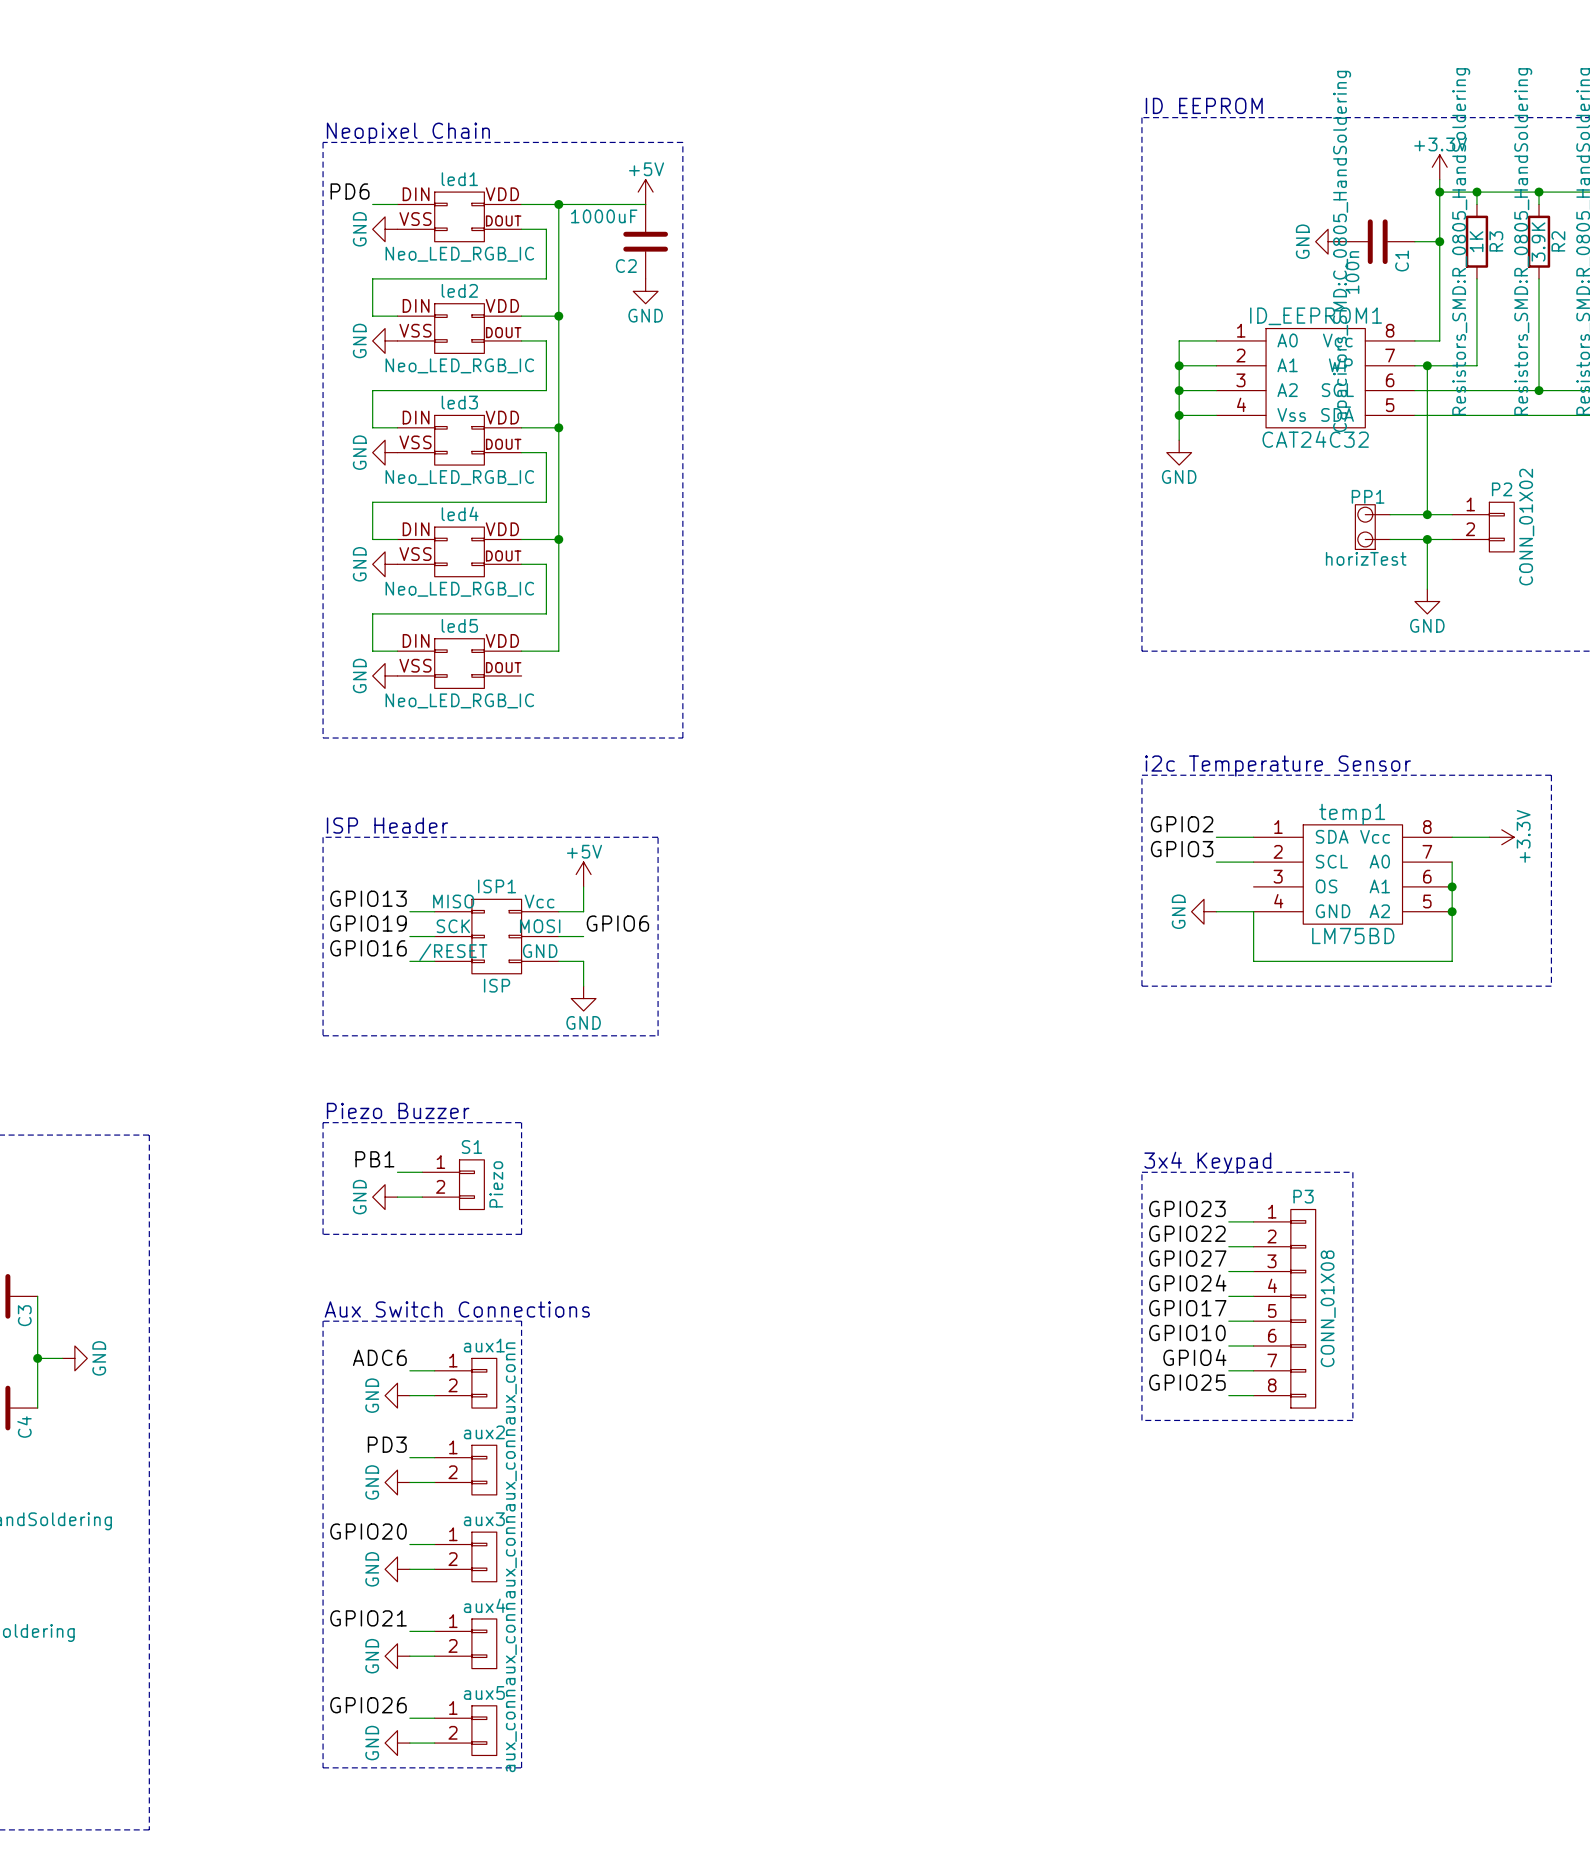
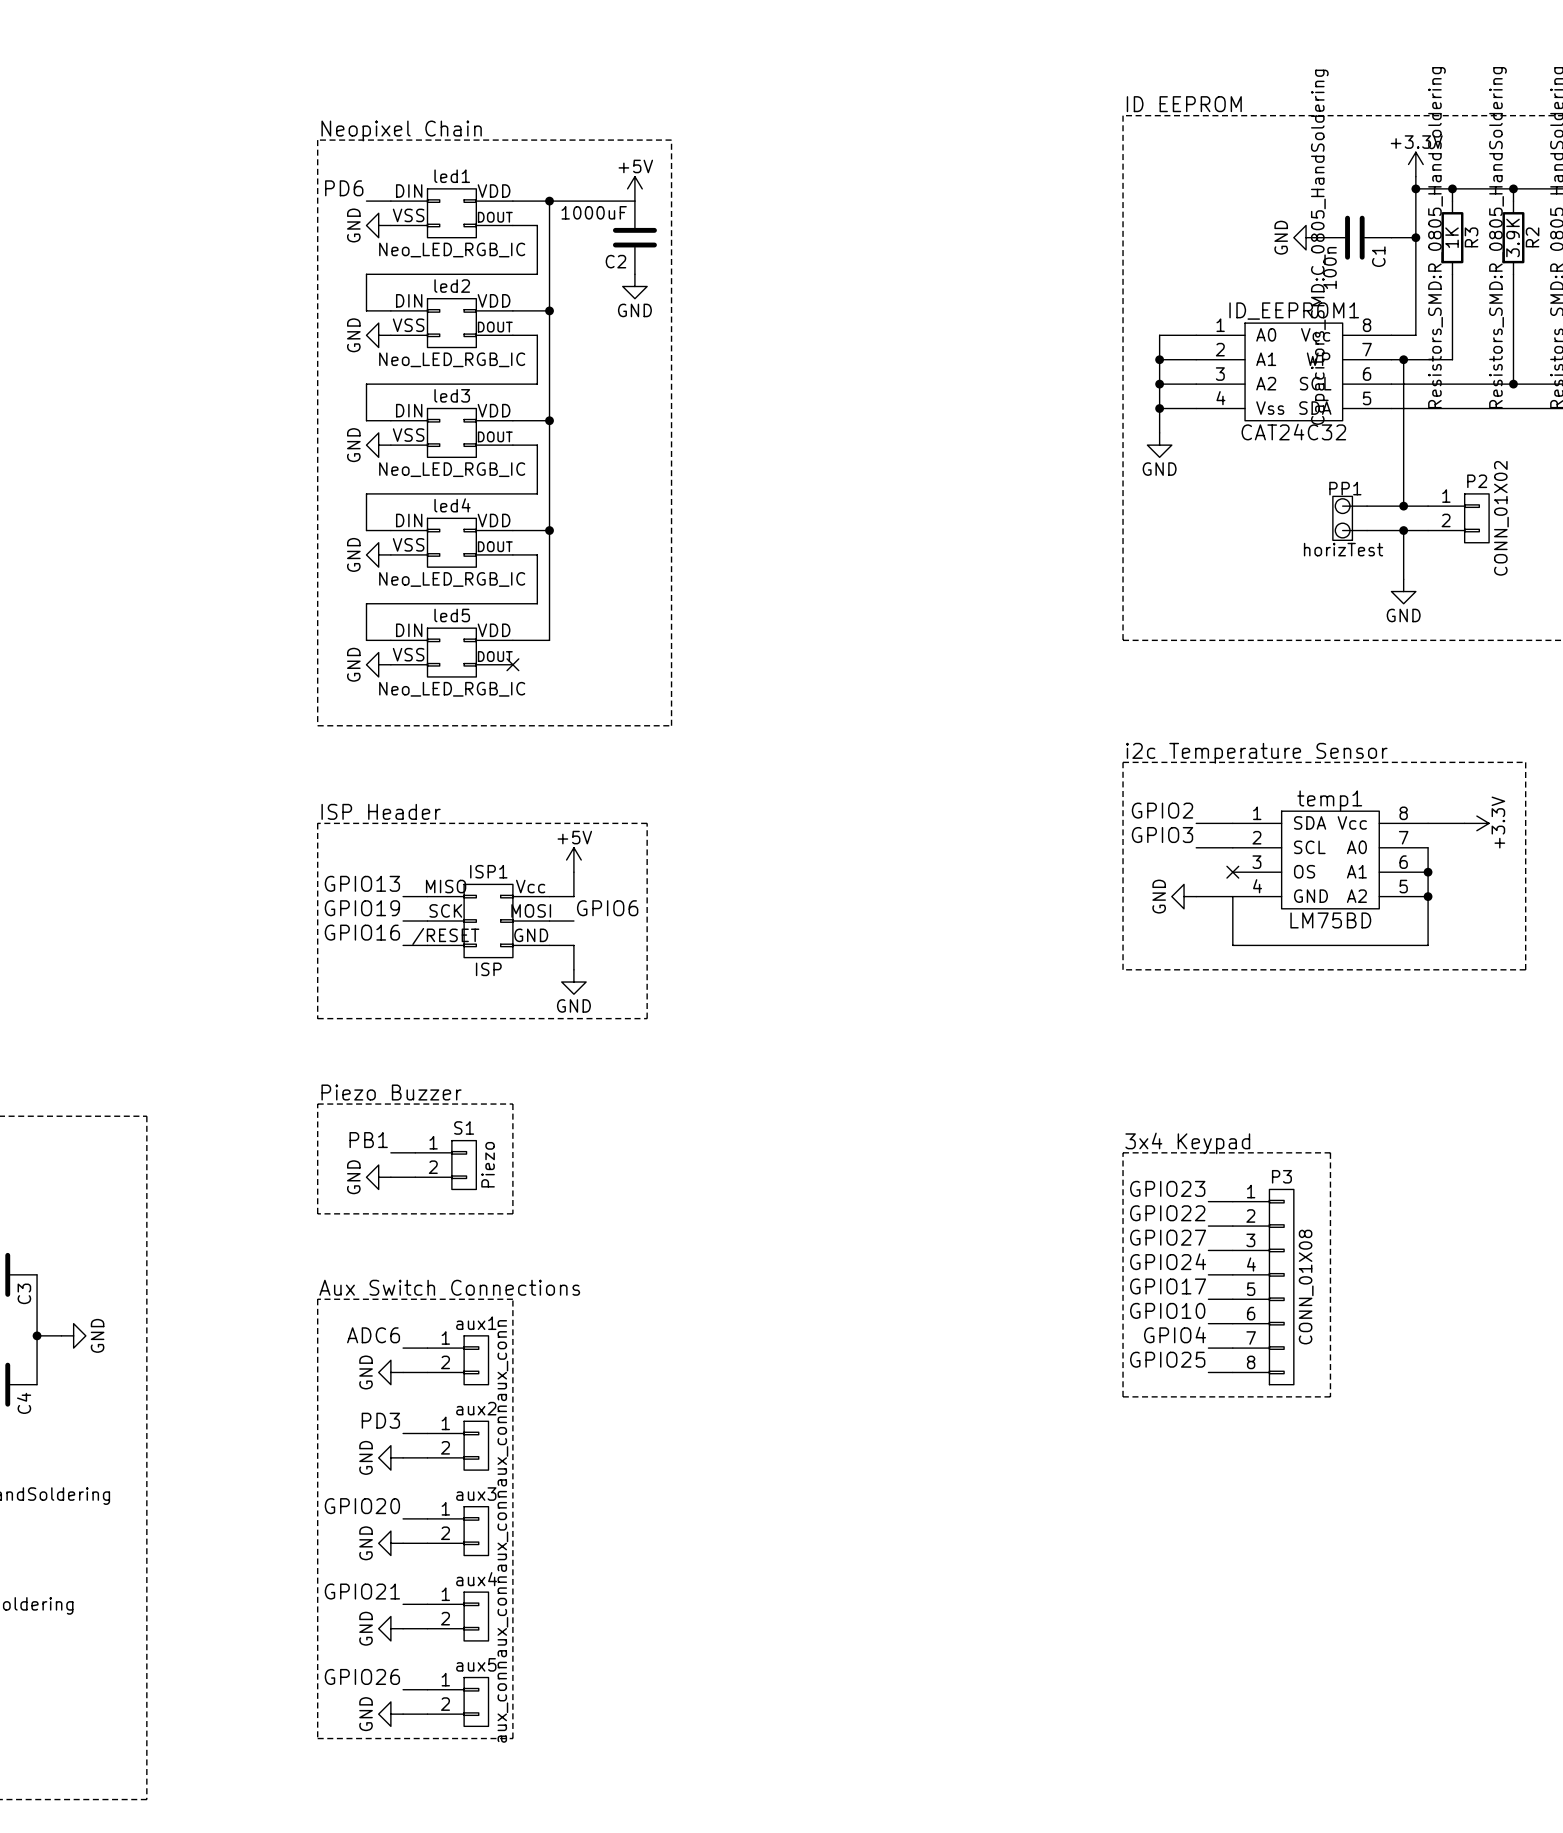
no-connect mark: none -> (512, 664)
no-connect mark: none -> (1232, 872)

